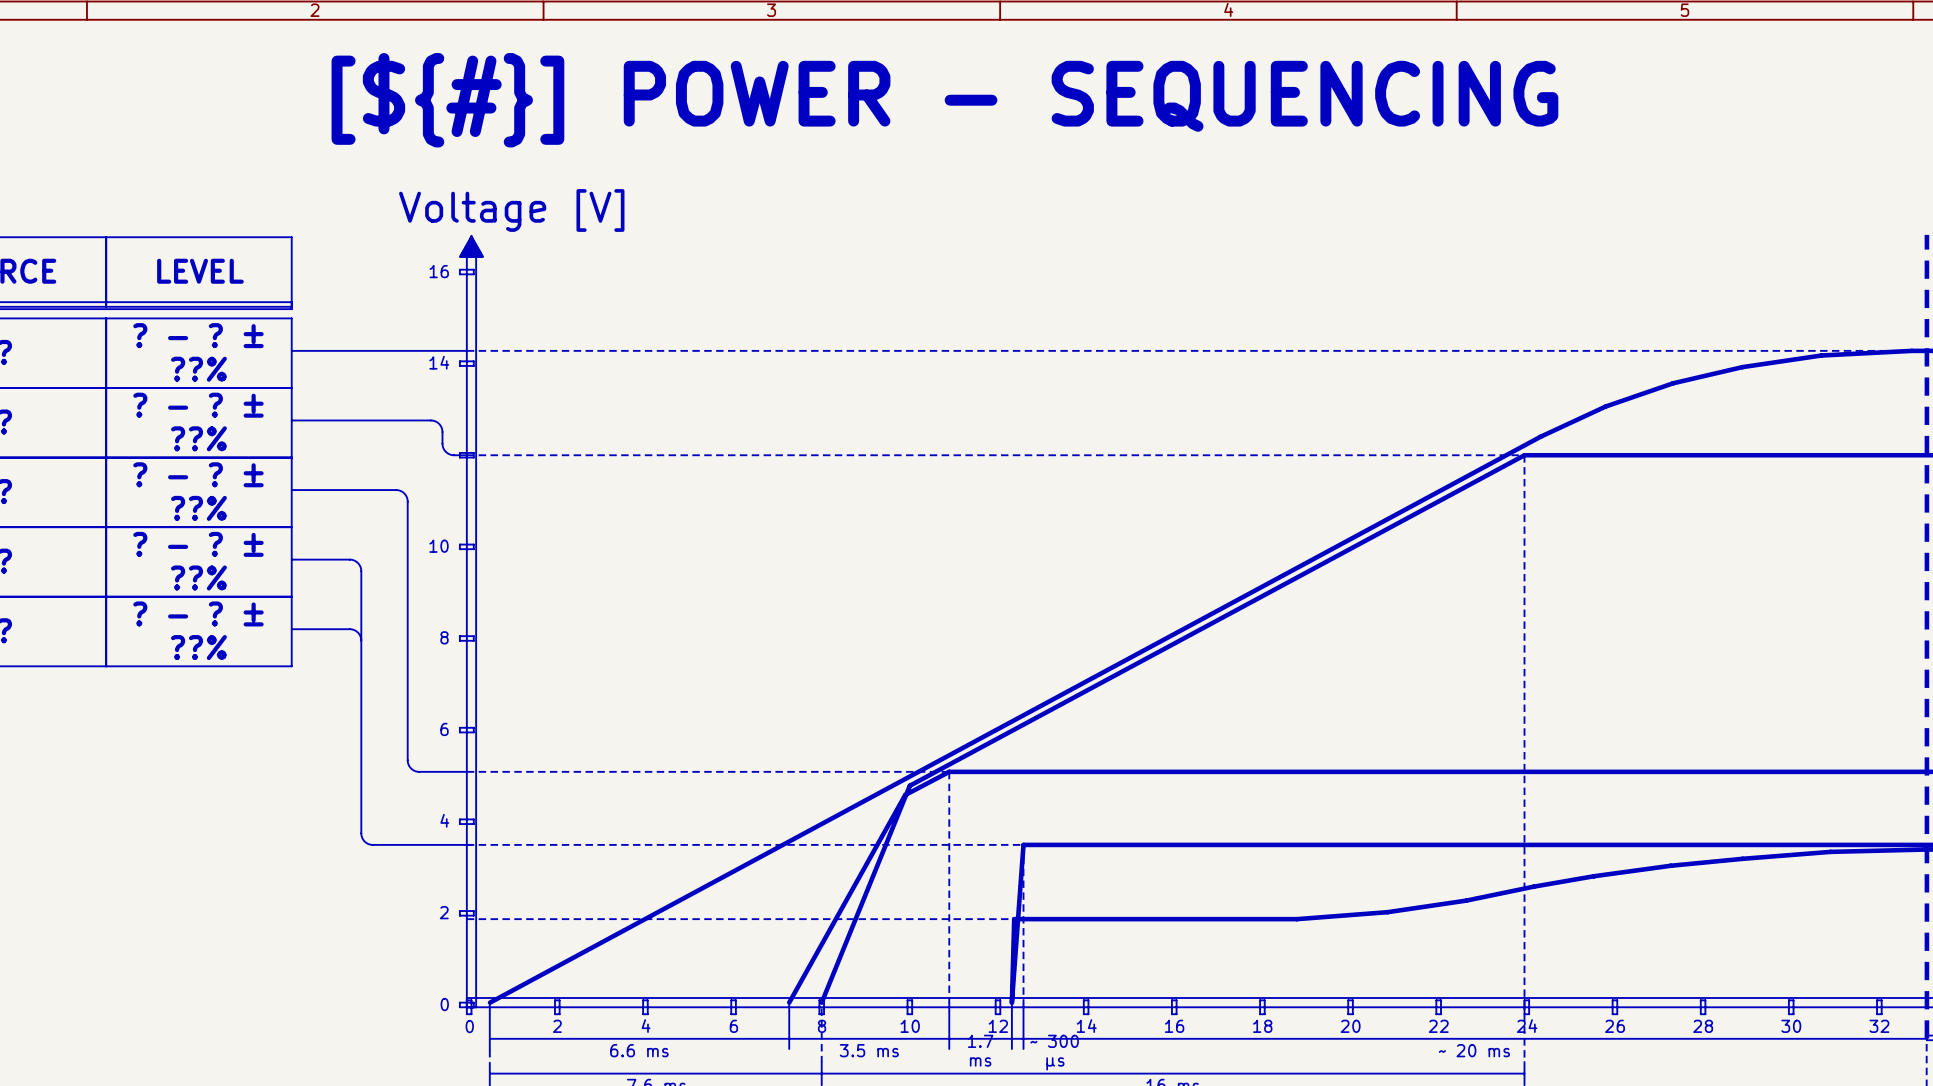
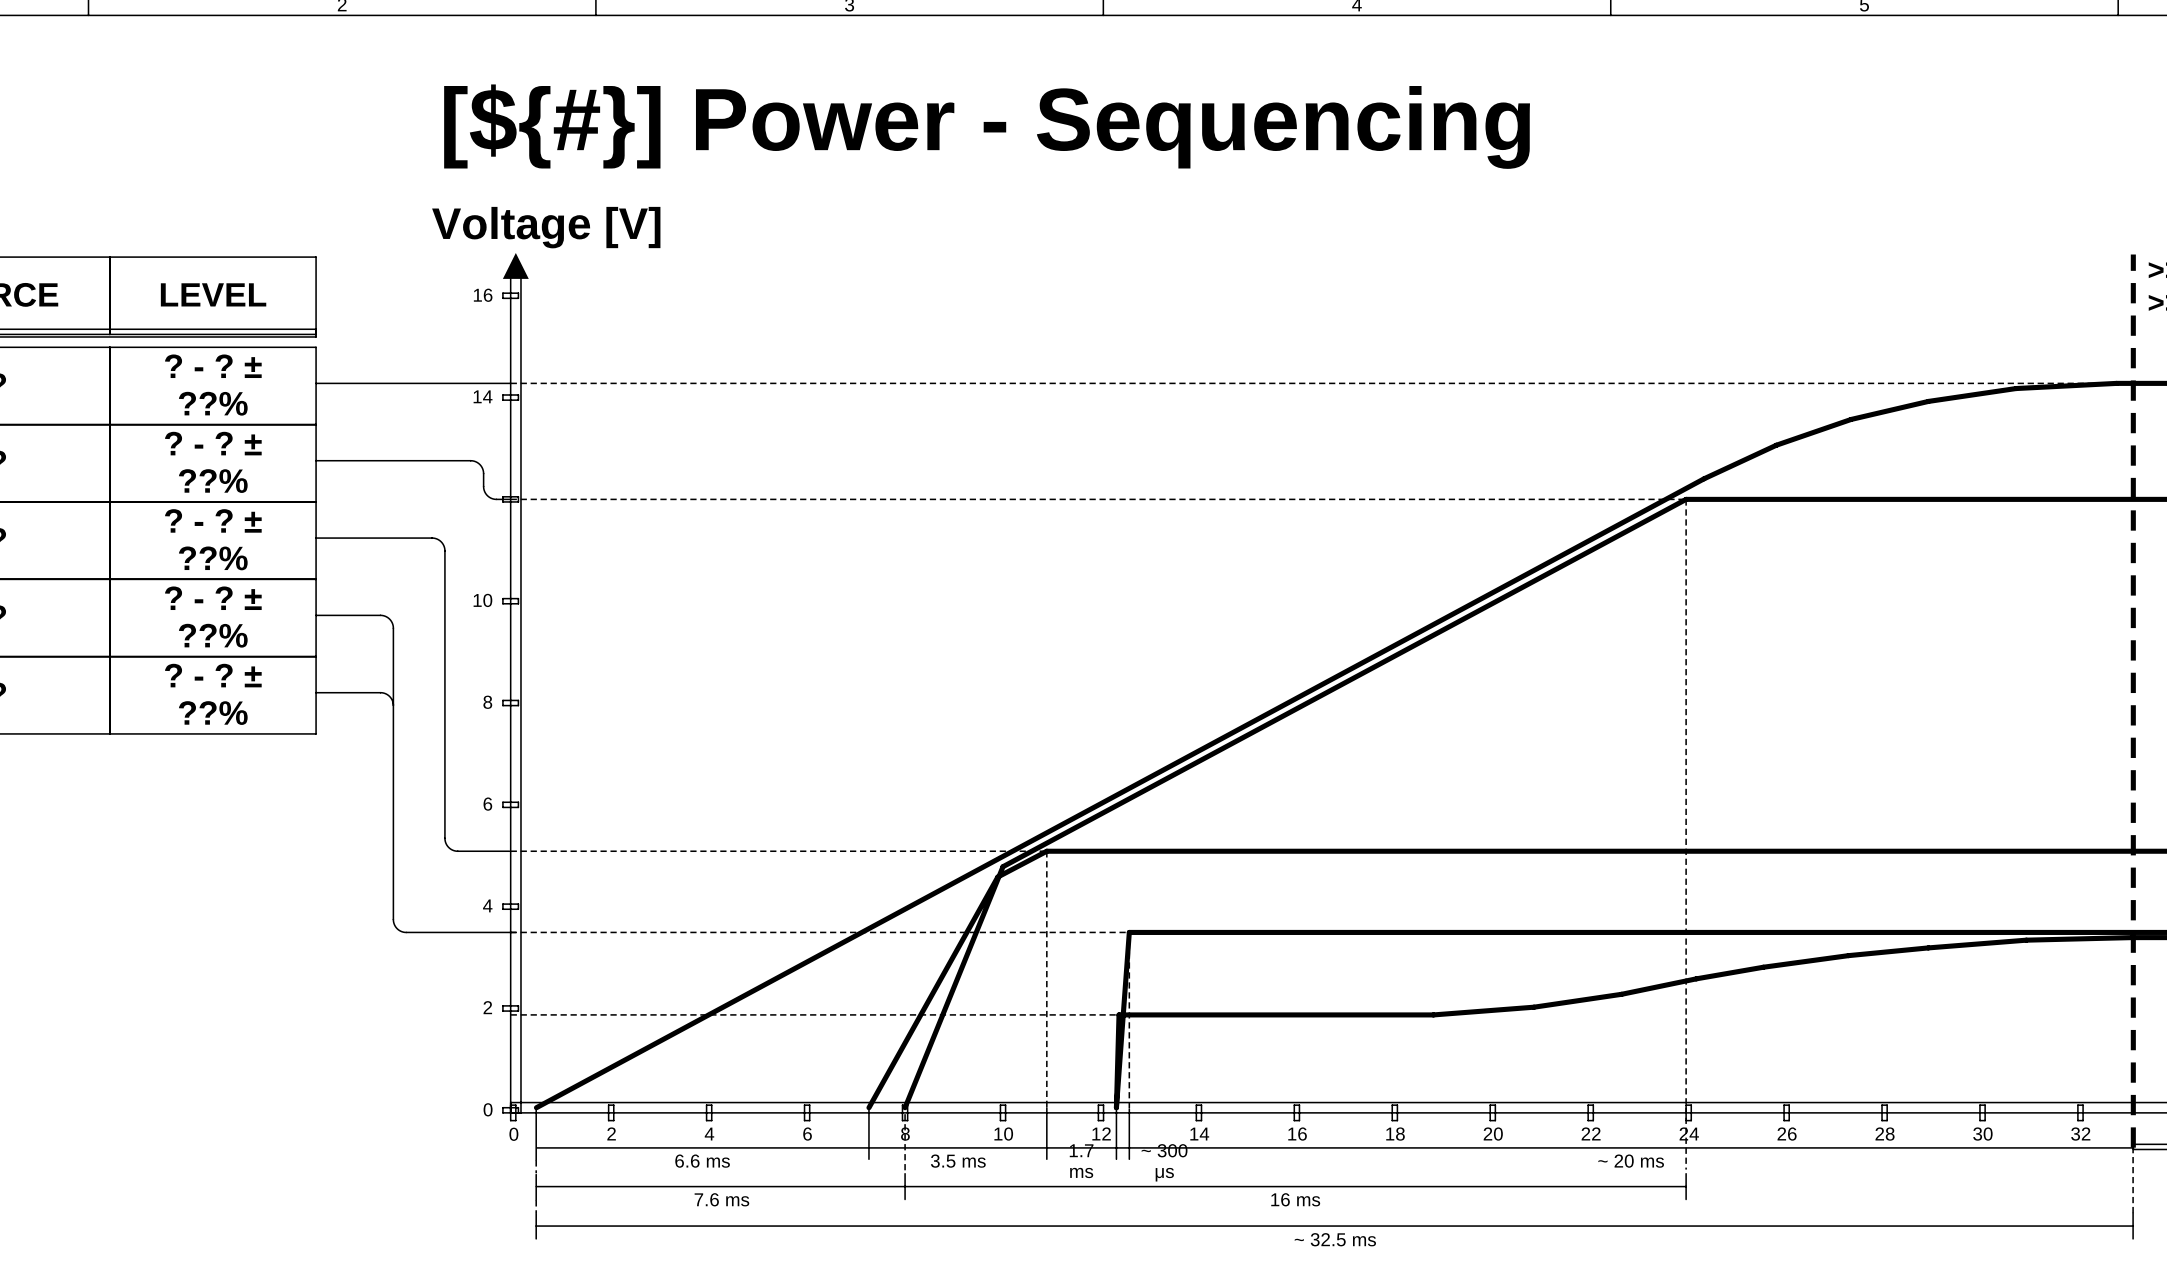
text: [${#}] POWER - SEQUENCING (944, 100) -> none
text: none -> [${#}] Power - Sequencing (987, 126)

